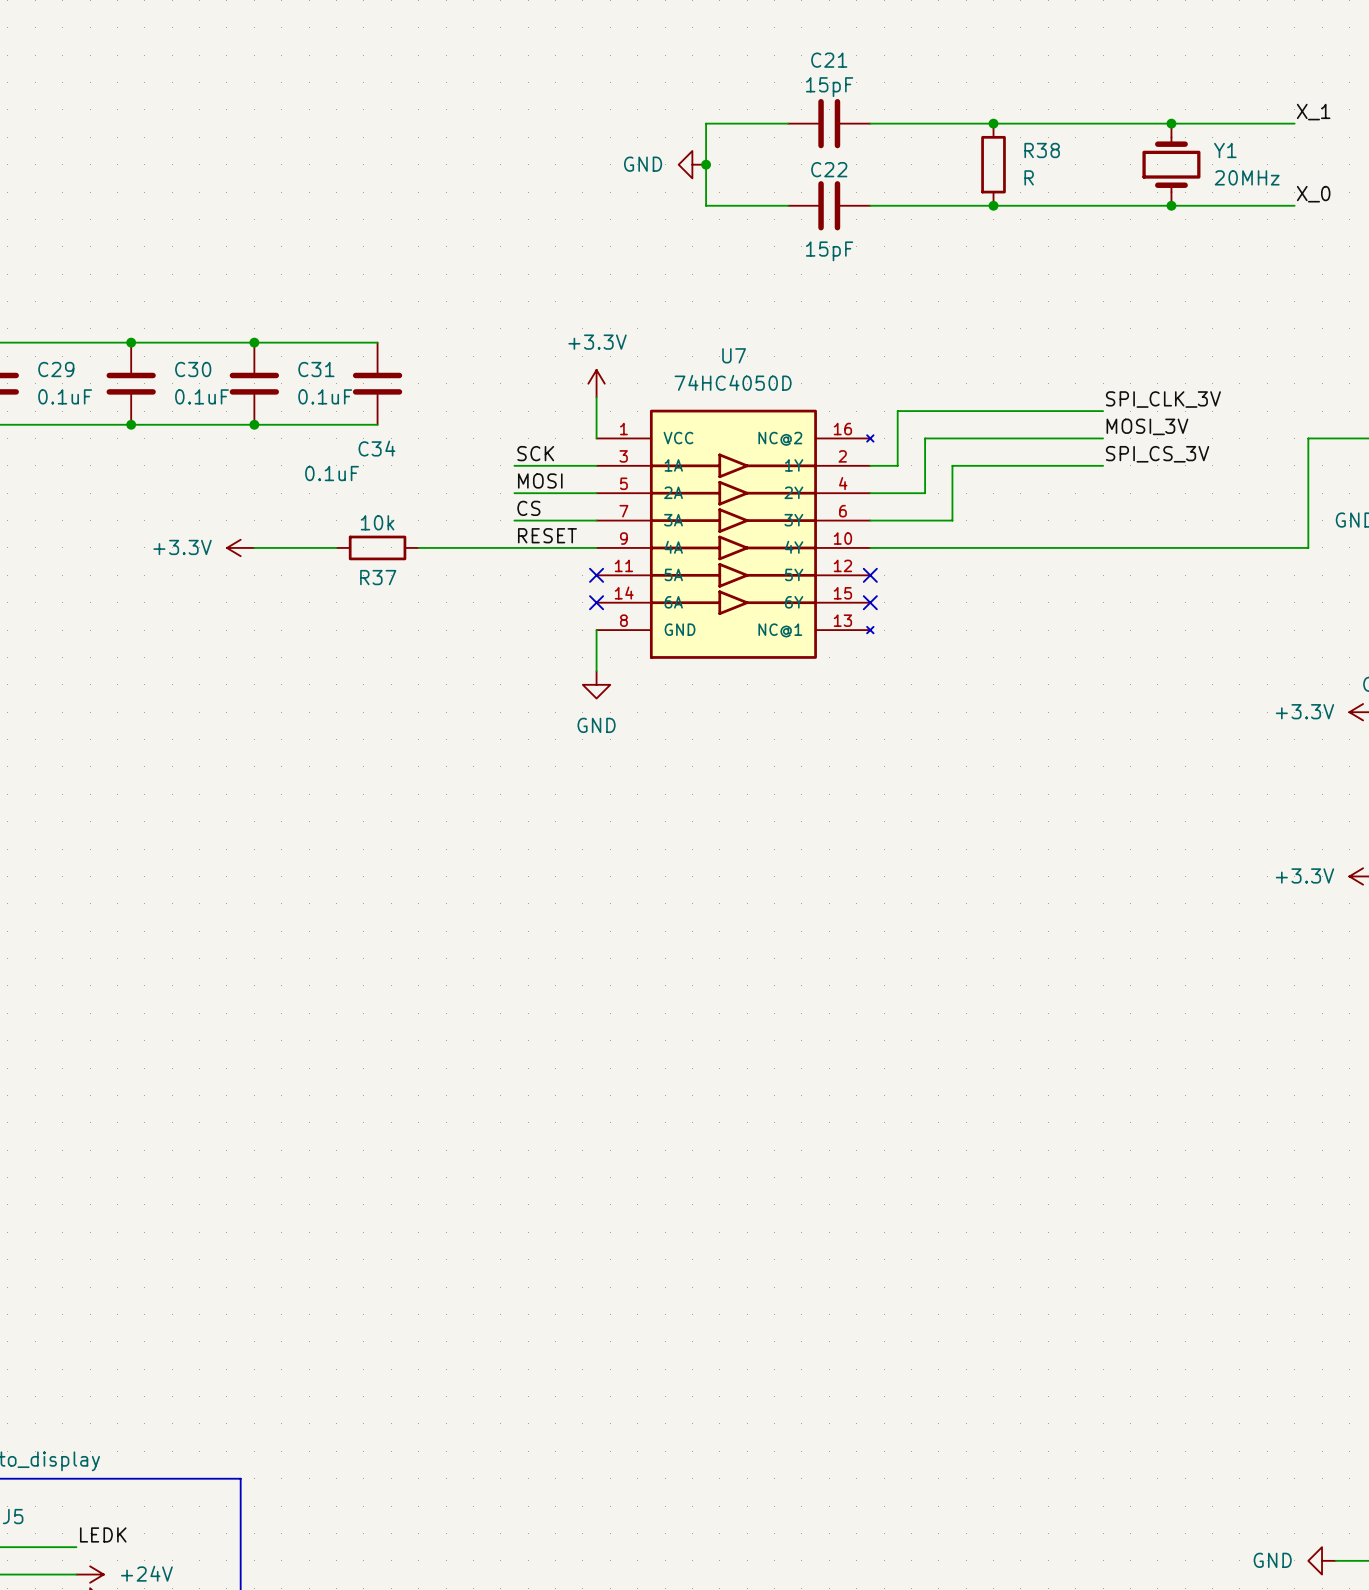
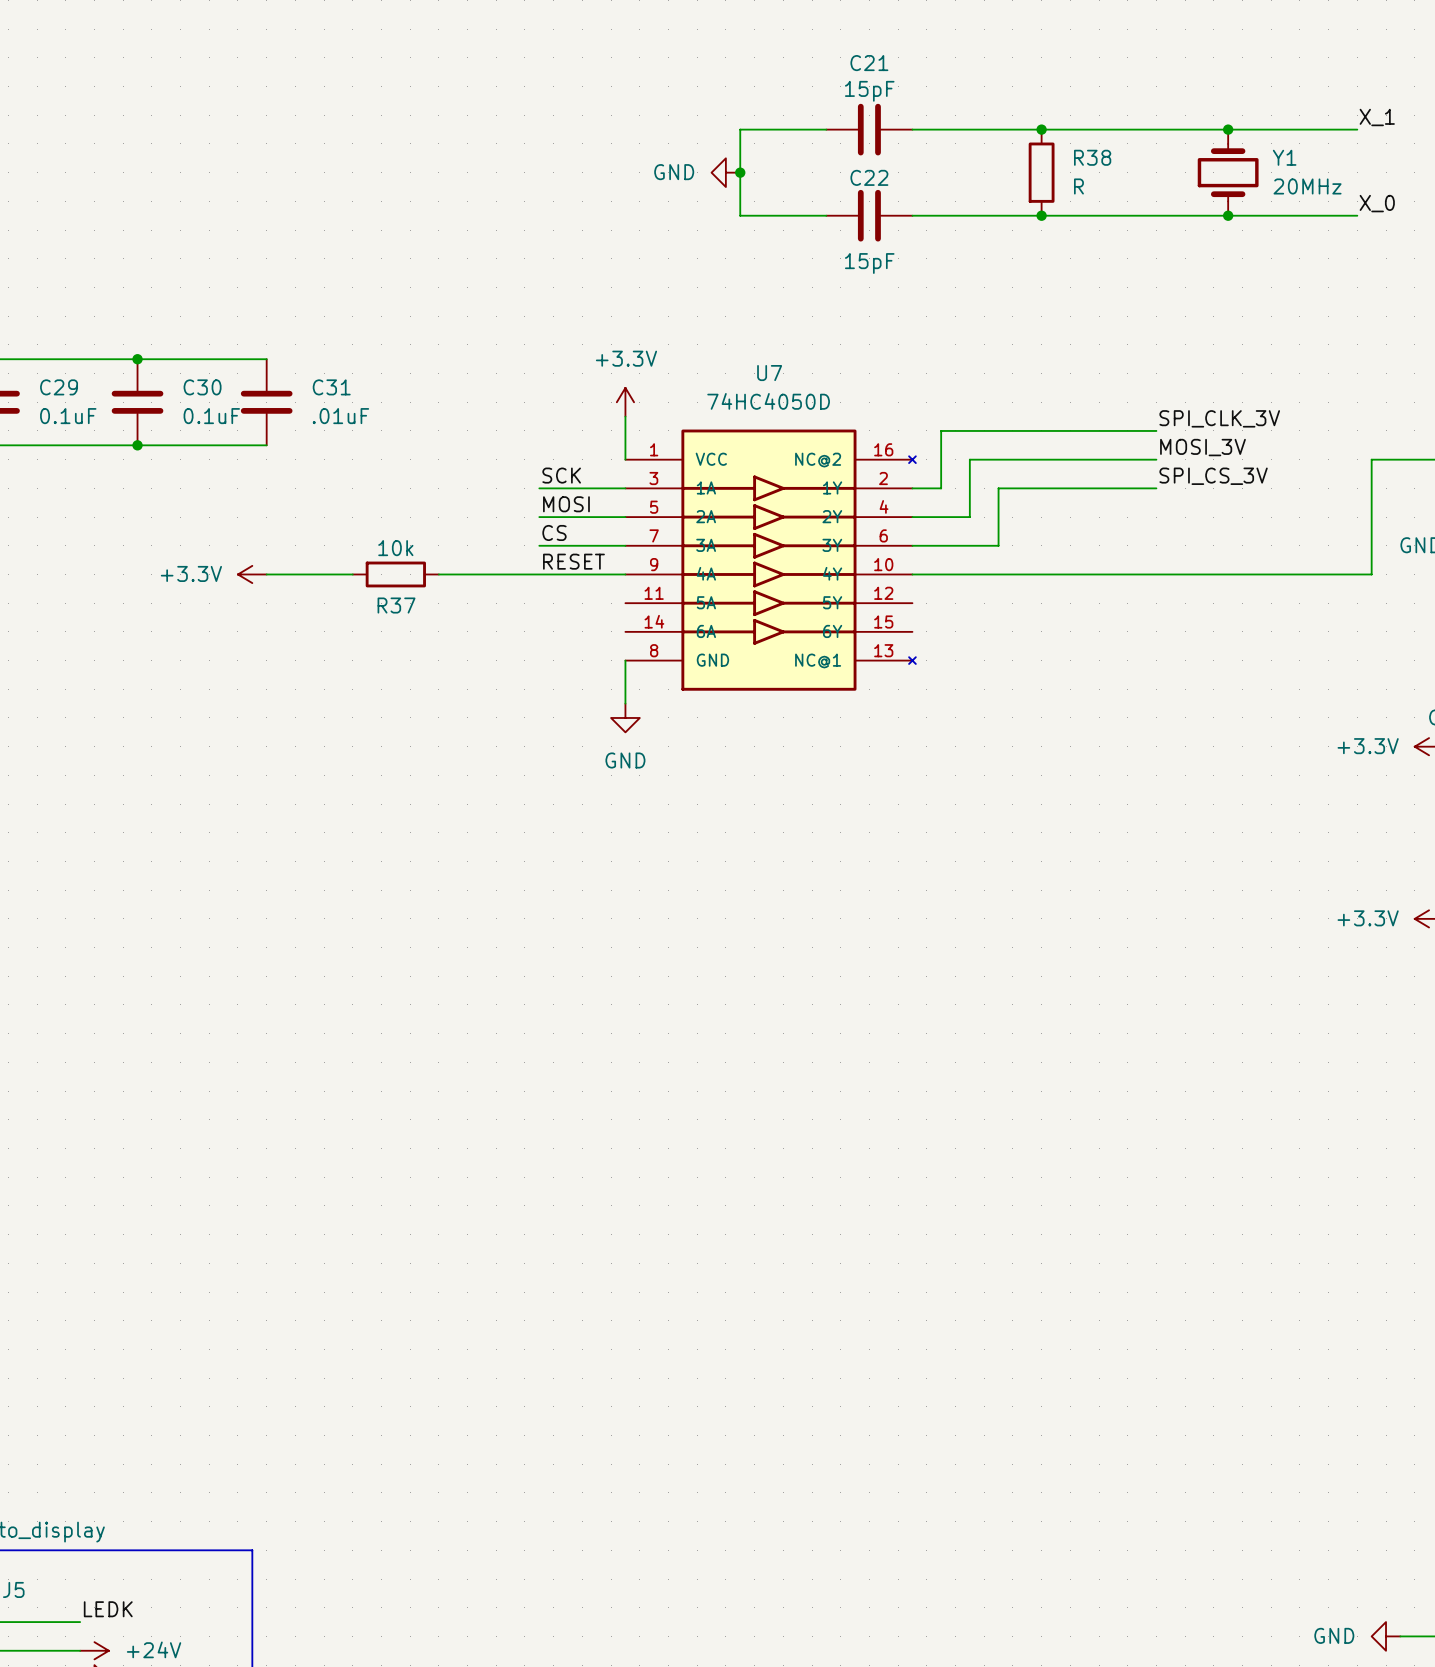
wire: (254, 342) (377, 342) -> none
junction: (254, 342) -> none
C34: 0.1uF (377, 383) -> none
C31 value: 0.1uF (325, 396) -> .01uF (340, 416)
wire: (254, 424) (377, 424) -> none
junction: (254, 424) -> none
no-connect mark: (596, 575) -> none
no-connect mark: (870, 575) -> none
no-connect mark: (596, 602) -> none
no-connect mark: (870, 602) -> none

